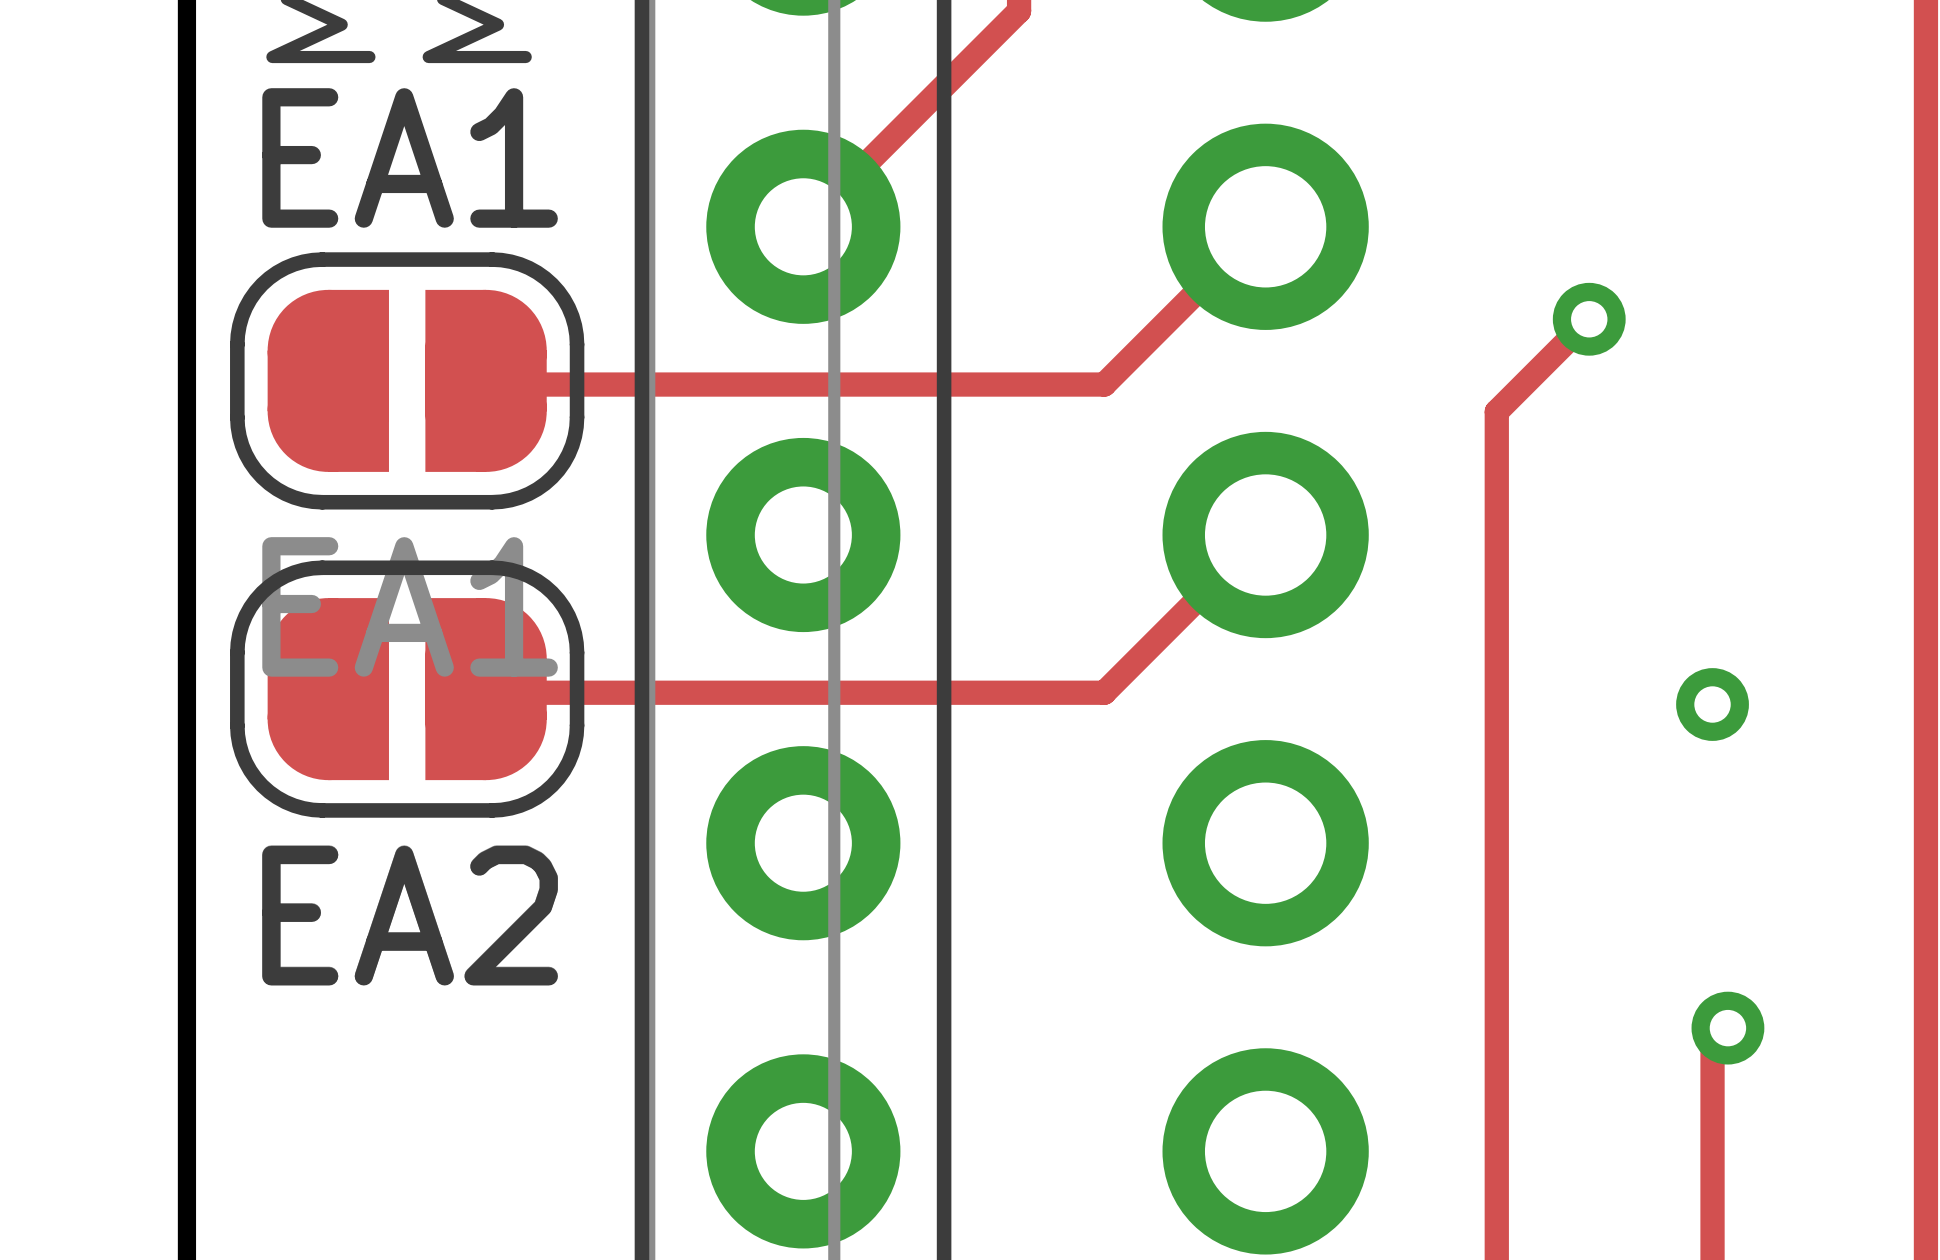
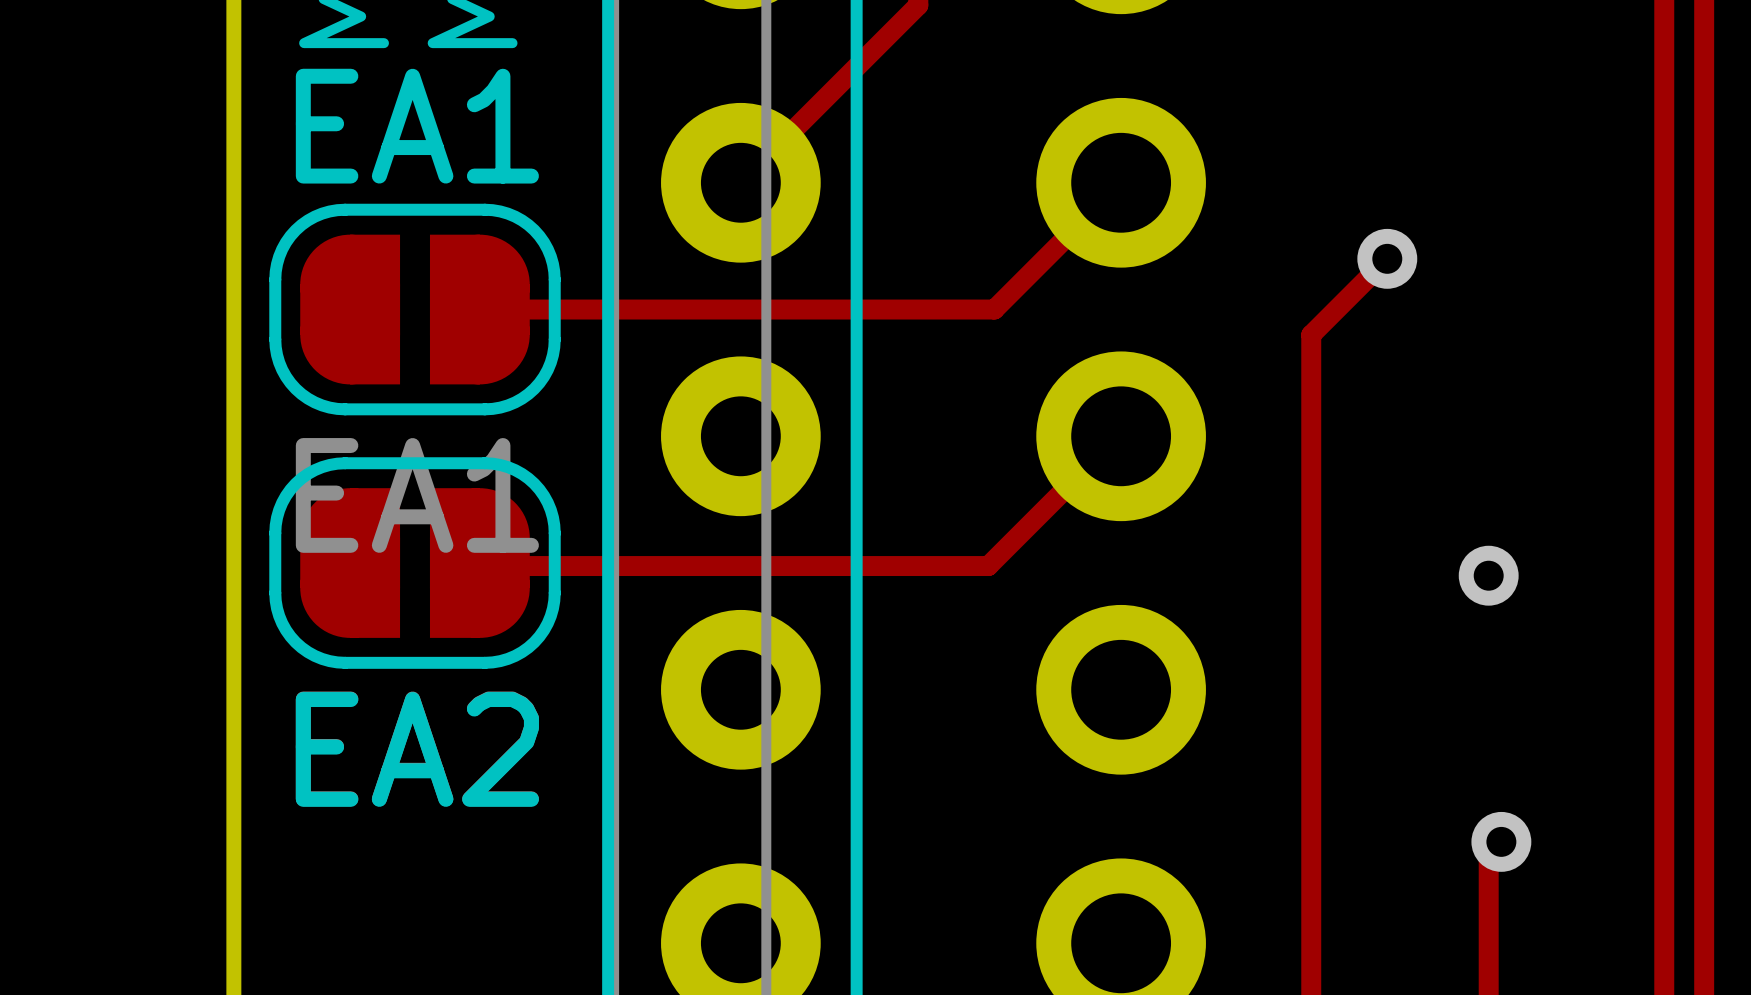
track: (1265, 223) (1104, 384) (486, 384) -> (1121, 182) (994, 309) (487, 309) (474, 296)

